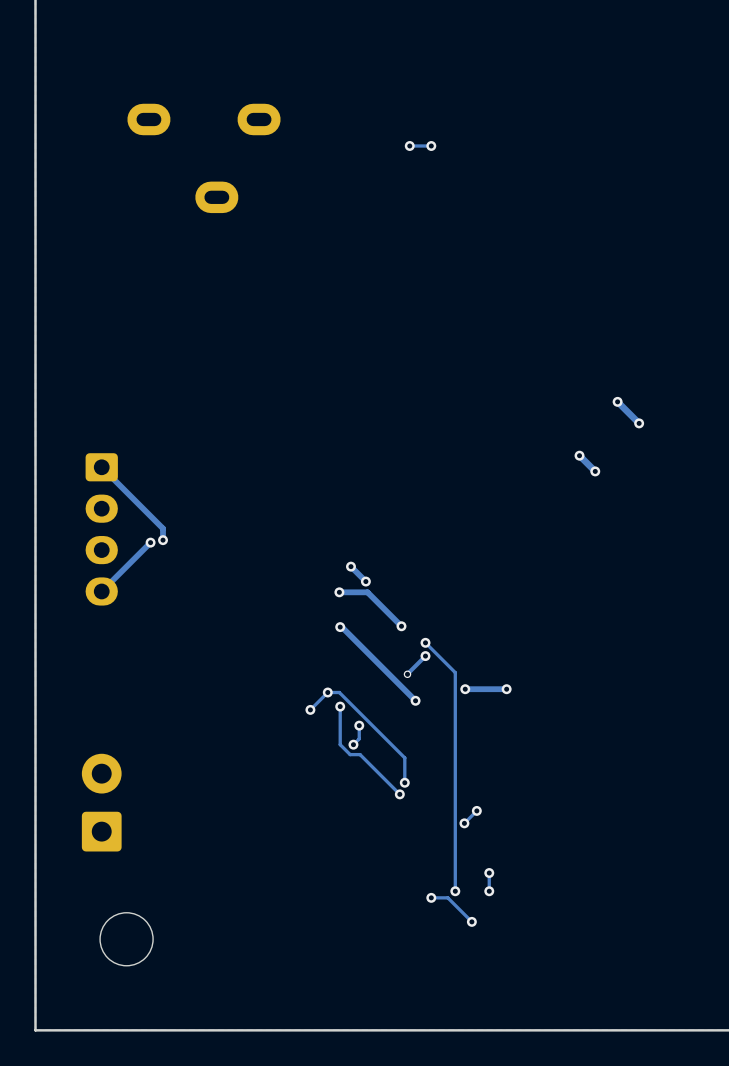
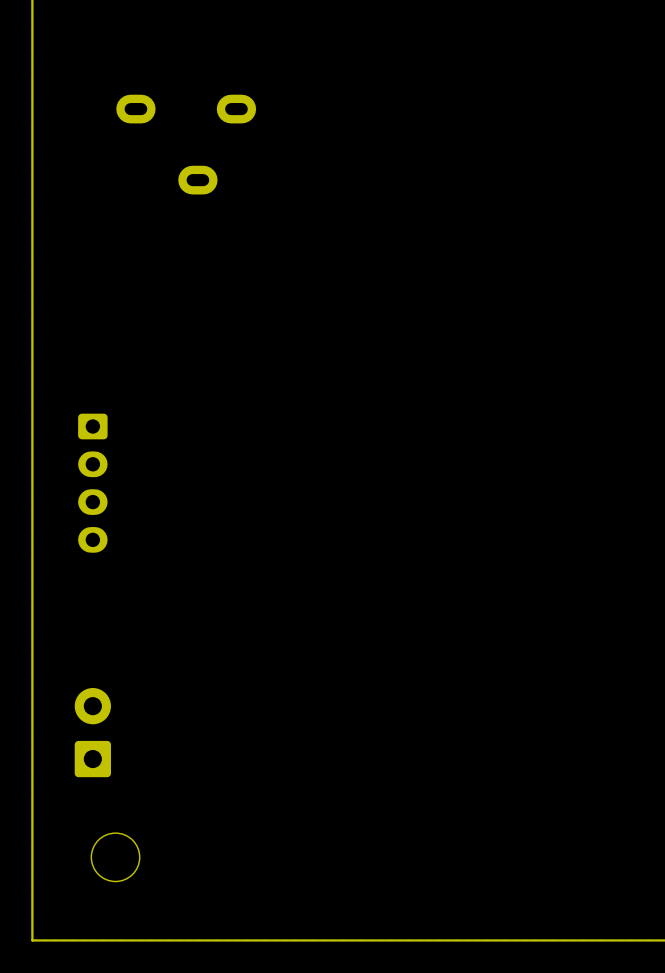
via: (409, 145) -> none
track: (431, 145) (409, 145) -> none
via: (431, 145) -> none
track: (617, 401) (639, 423) -> none
via: (617, 401) -> none
via: (639, 423) -> none
track: (579, 455) (595, 471) -> none
via: (579, 455) -> none
track: (101, 467) (163, 528) (163, 540) -> none
via: (595, 471) -> none
via: (163, 540) -> none
track: (150, 542) (101, 591) -> none
via: (150, 542) -> none
track: (350, 566) (365, 581) -> none
via: (350, 566) -> none
via: (365, 581) -> none
track: (339, 592) (367, 592) (401, 626) -> none
via: (339, 592) -> none
via: (401, 626) -> none
track: (340, 627) (415, 700) -> none
via: (340, 627) -> none
track: (425, 642) (455, 672) (455, 891) -> none
via: (425, 642) -> none
track: (425, 656) (407, 674) -> none
via: (425, 656) -> none
via: (407, 674) -> none
via: (465, 689) -> none
track: (506, 689) (465, 689) -> none
via: (506, 689) -> none
via: (327, 692) -> none
via: (415, 700) -> none
track: (340, 706) (340, 744) (350, 754) (360, 754) (399, 794) -> none
via: (340, 706) -> none
track: (310, 709) (327, 692) (339, 692) (404, 757) (404, 782) -> none
via: (310, 709) -> none
track: (359, 725) (359, 738) (353, 744) -> none
via: (359, 725) -> none
via: (353, 744) -> none
via: (404, 782) -> none
via: (399, 794) -> none
track: (476, 810) (464, 823) -> none
via: (476, 810) -> none
via: (464, 823) -> none
track: (489, 873) (489, 891) -> none
via: (489, 873) -> none
via: (455, 891) -> none
via: (489, 891) -> none
track: (431, 897) (447, 897) (471, 921) -> none
via: (431, 897) -> none
via: (471, 921) -> none

